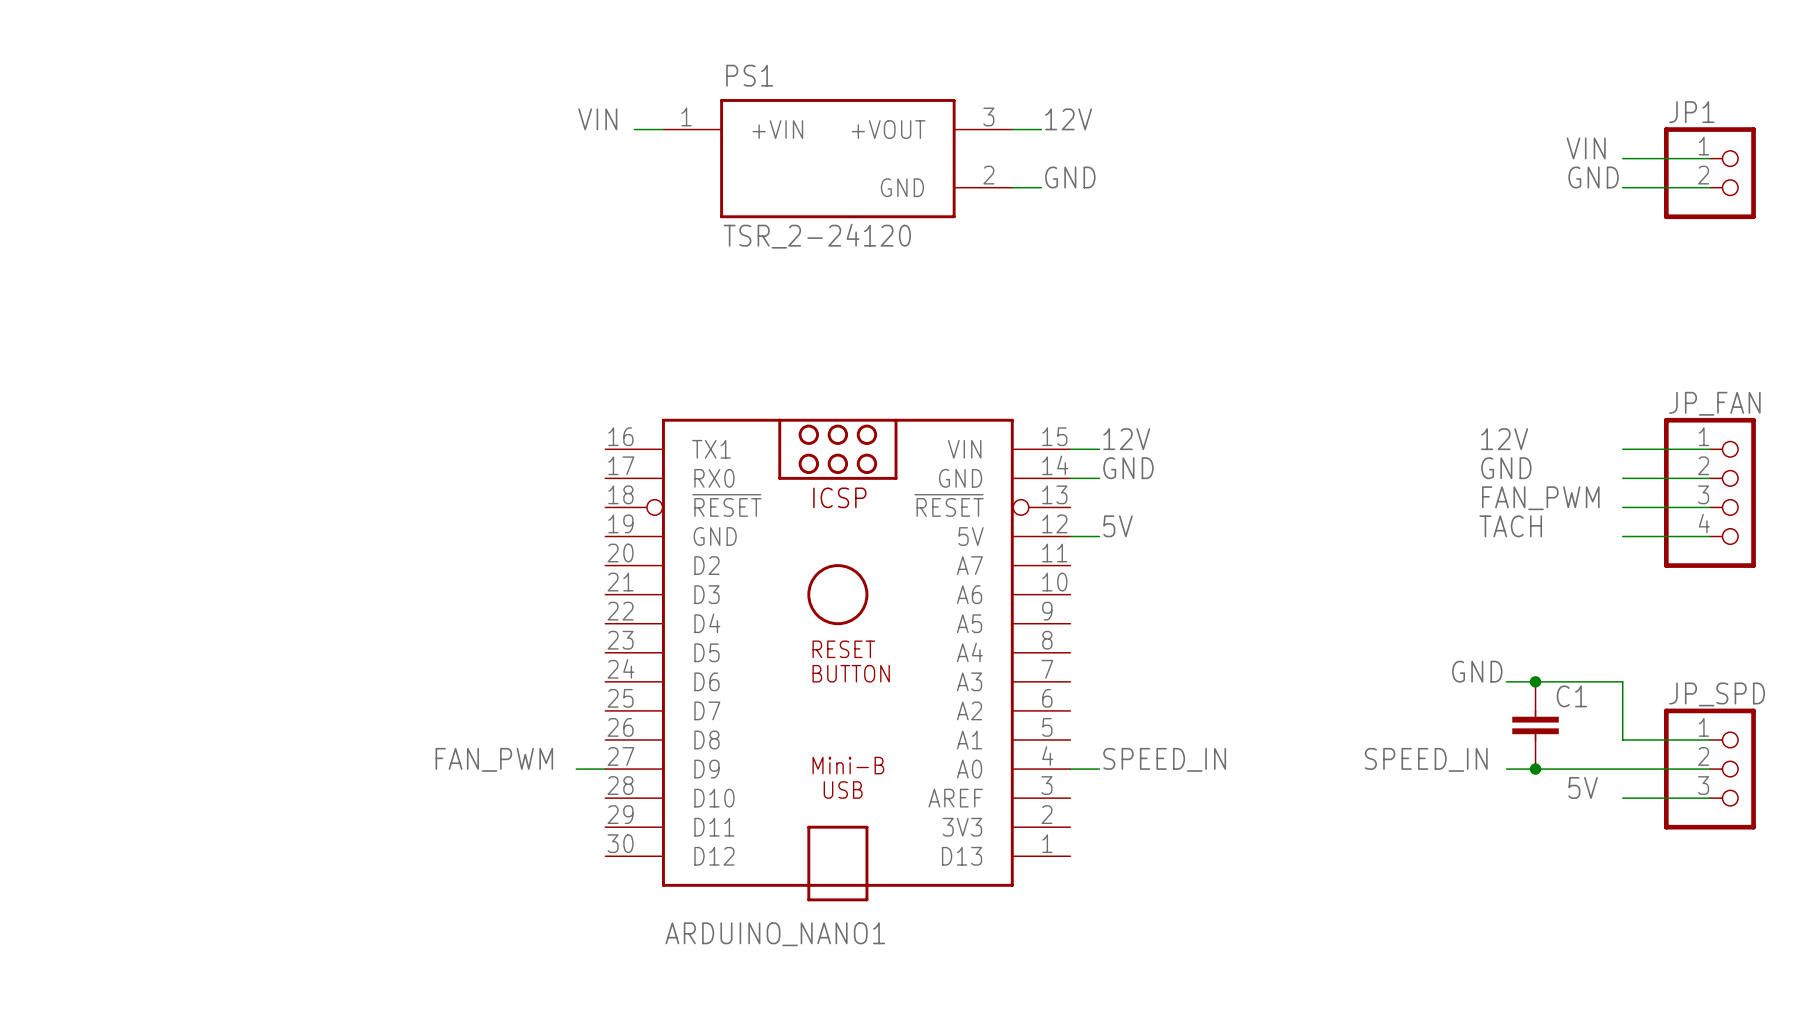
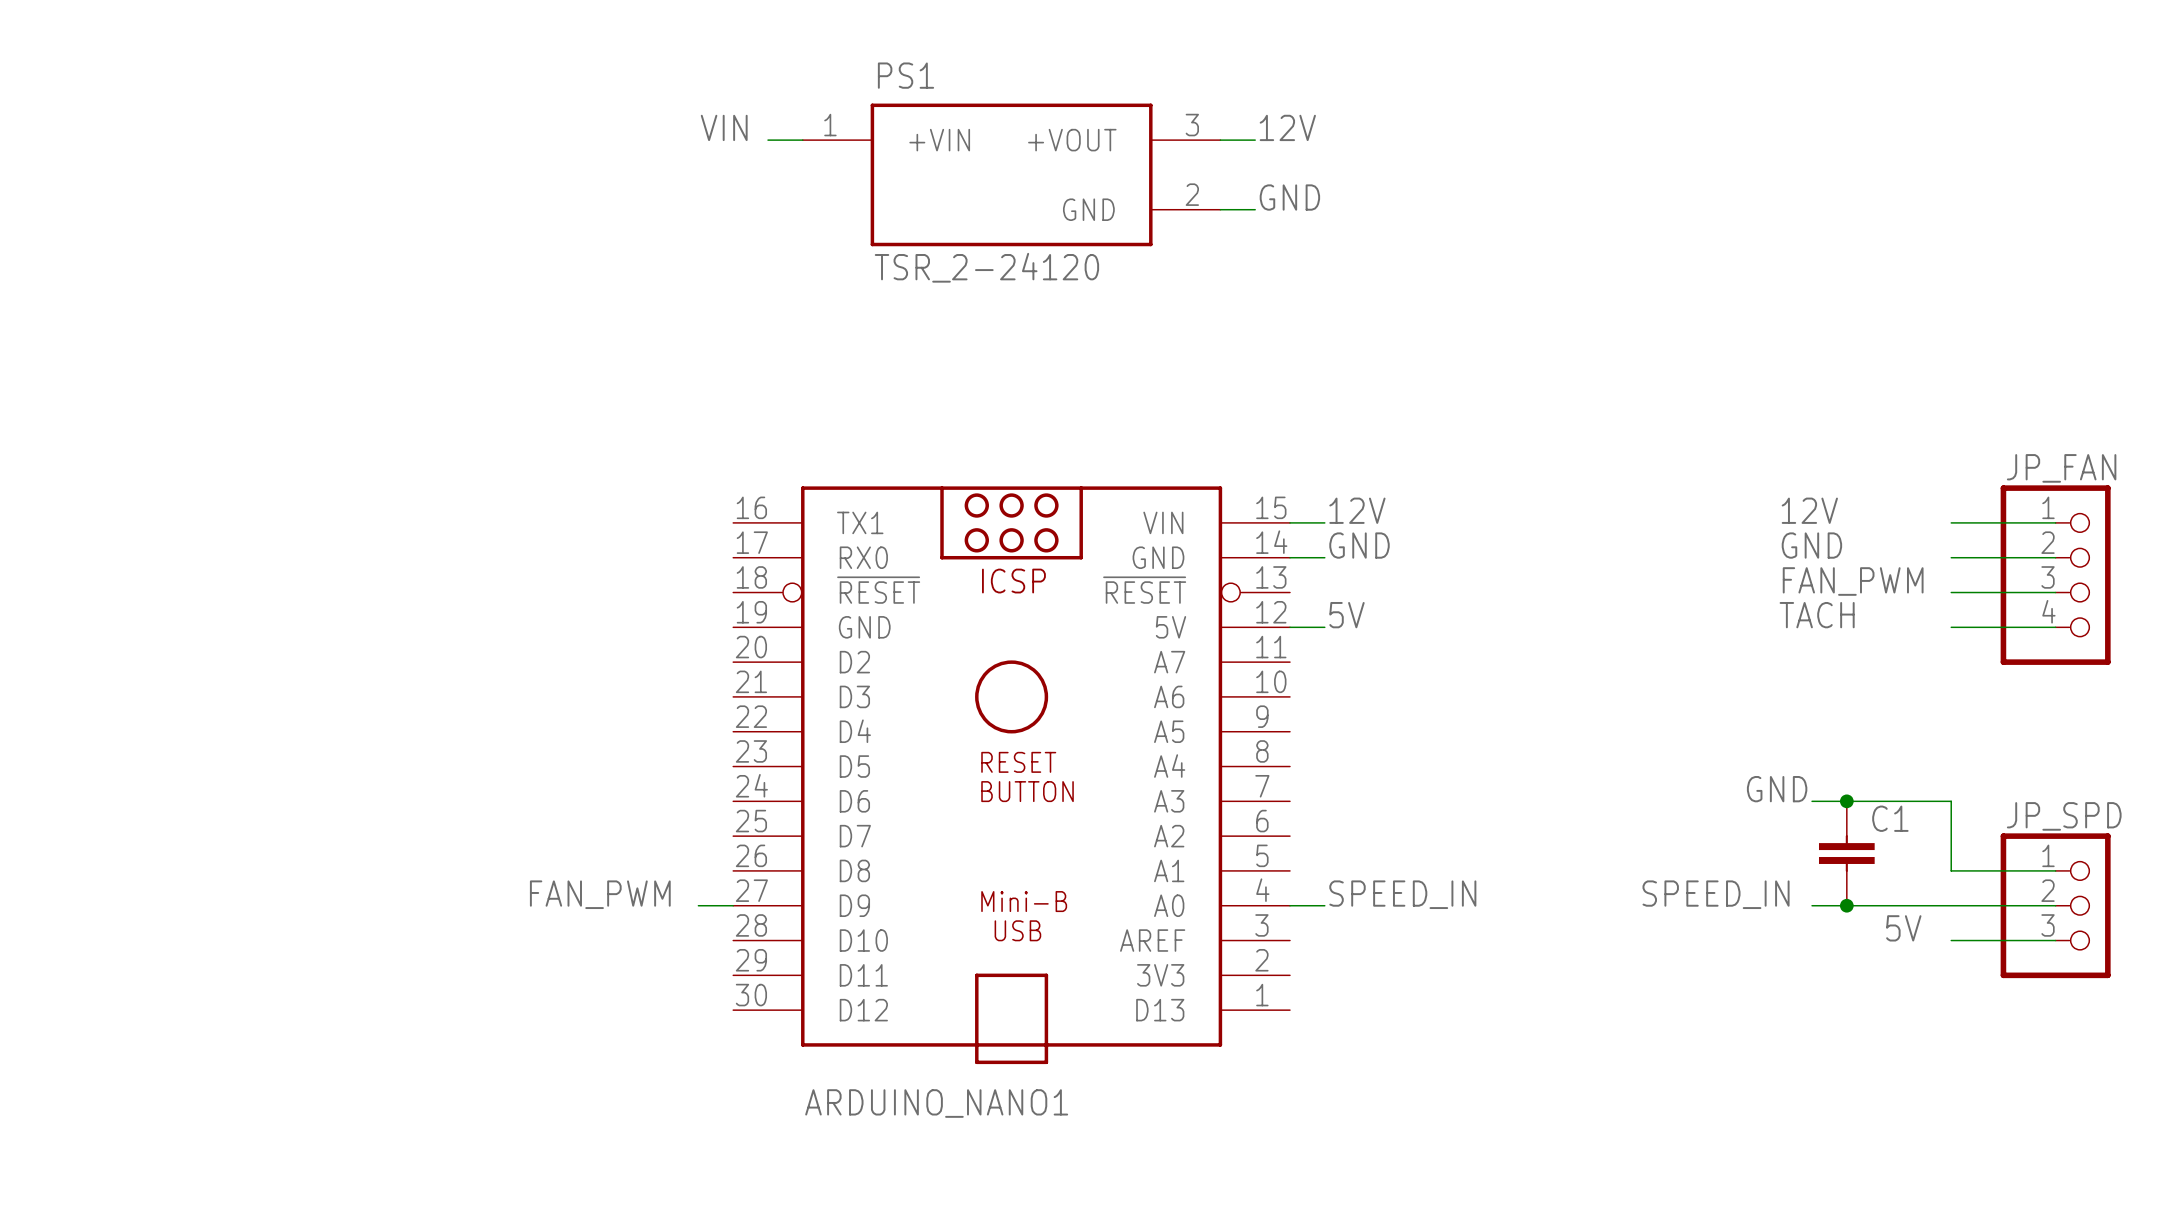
label: VIN (1586, 148) -> none
wire: (1622, 158) (1709, 158) -> none
JP1: (1709, 173) -> none
label: GND (1593, 177) -> none
wire: (1622, 187) (1709, 187) -> none

